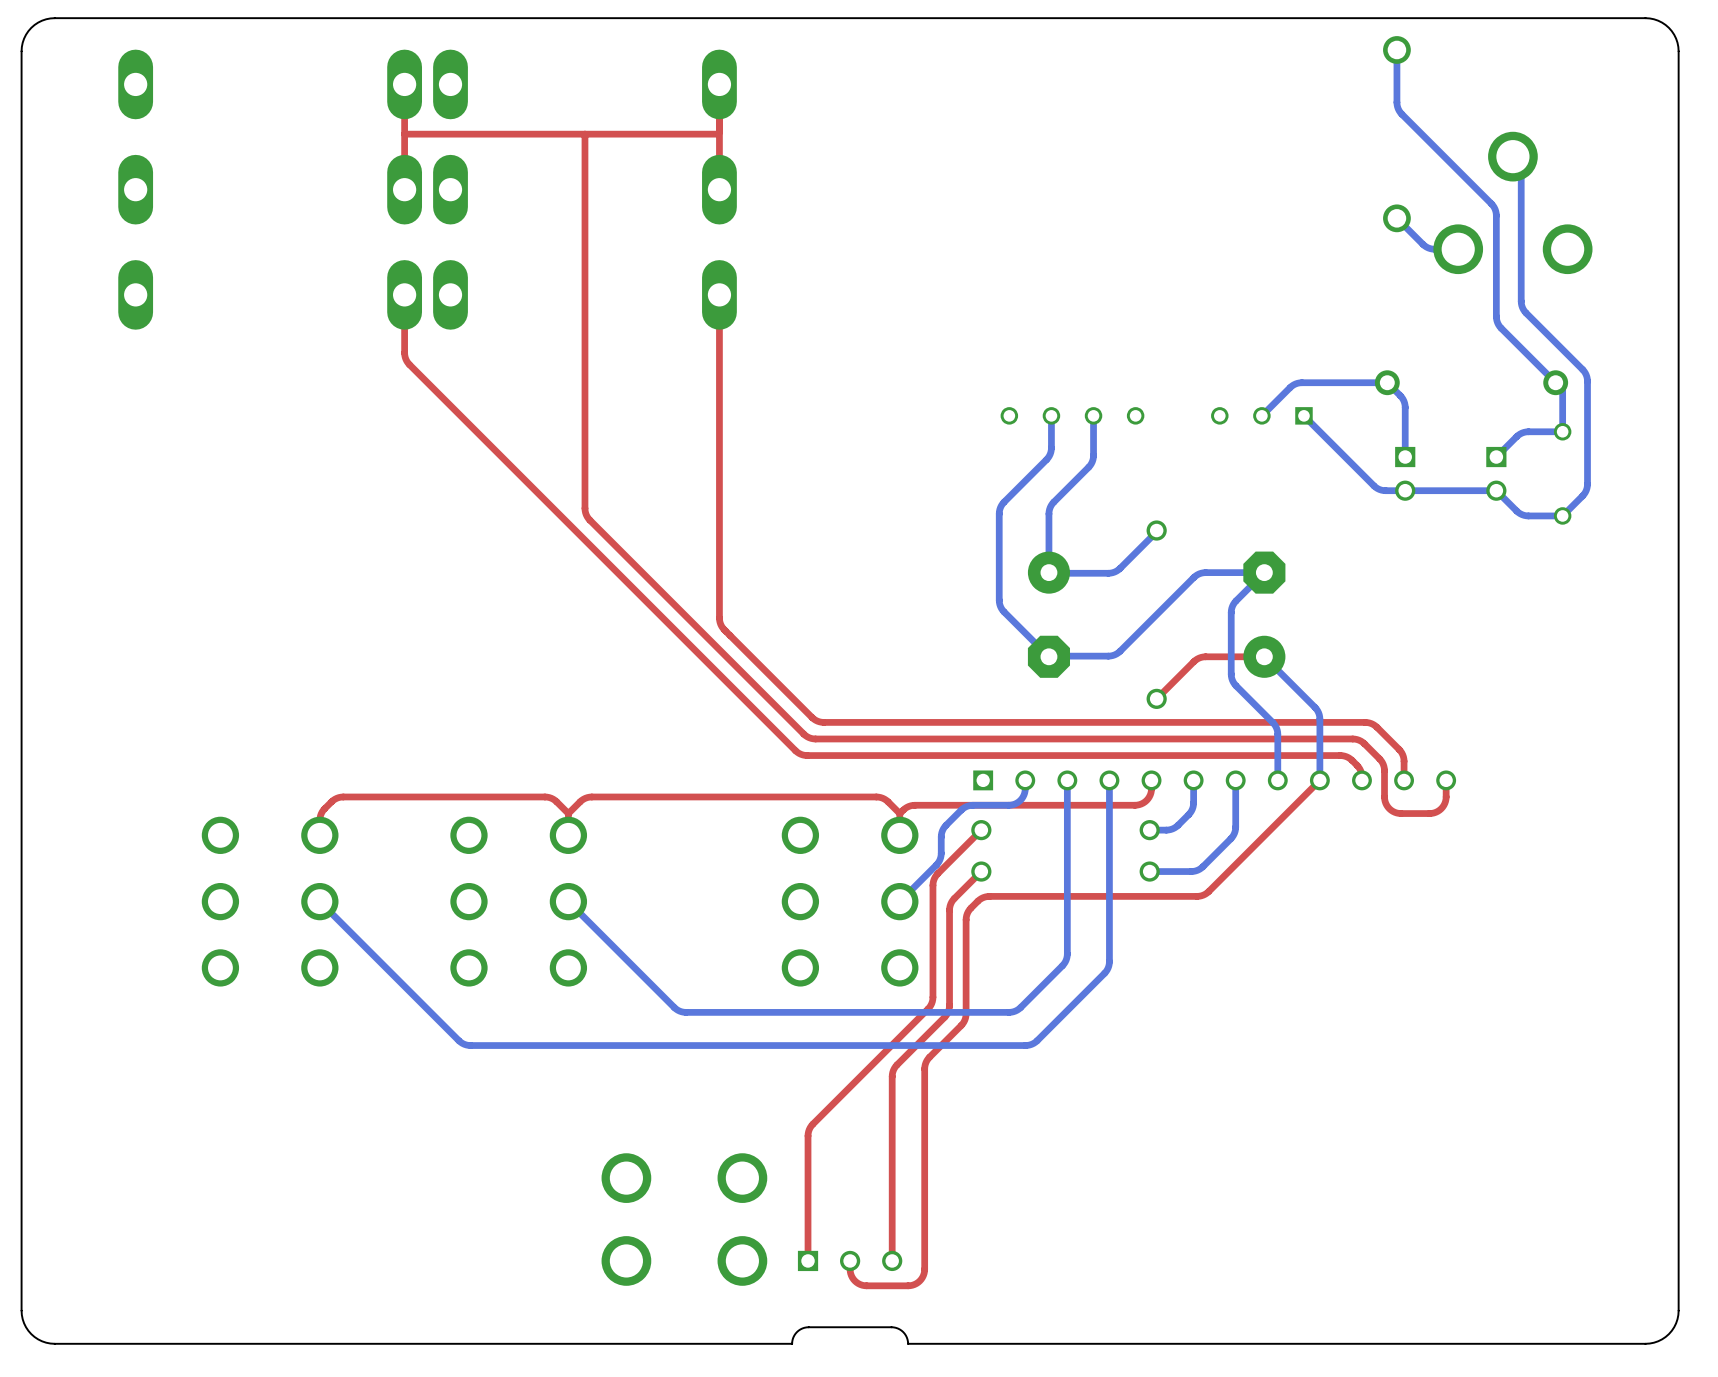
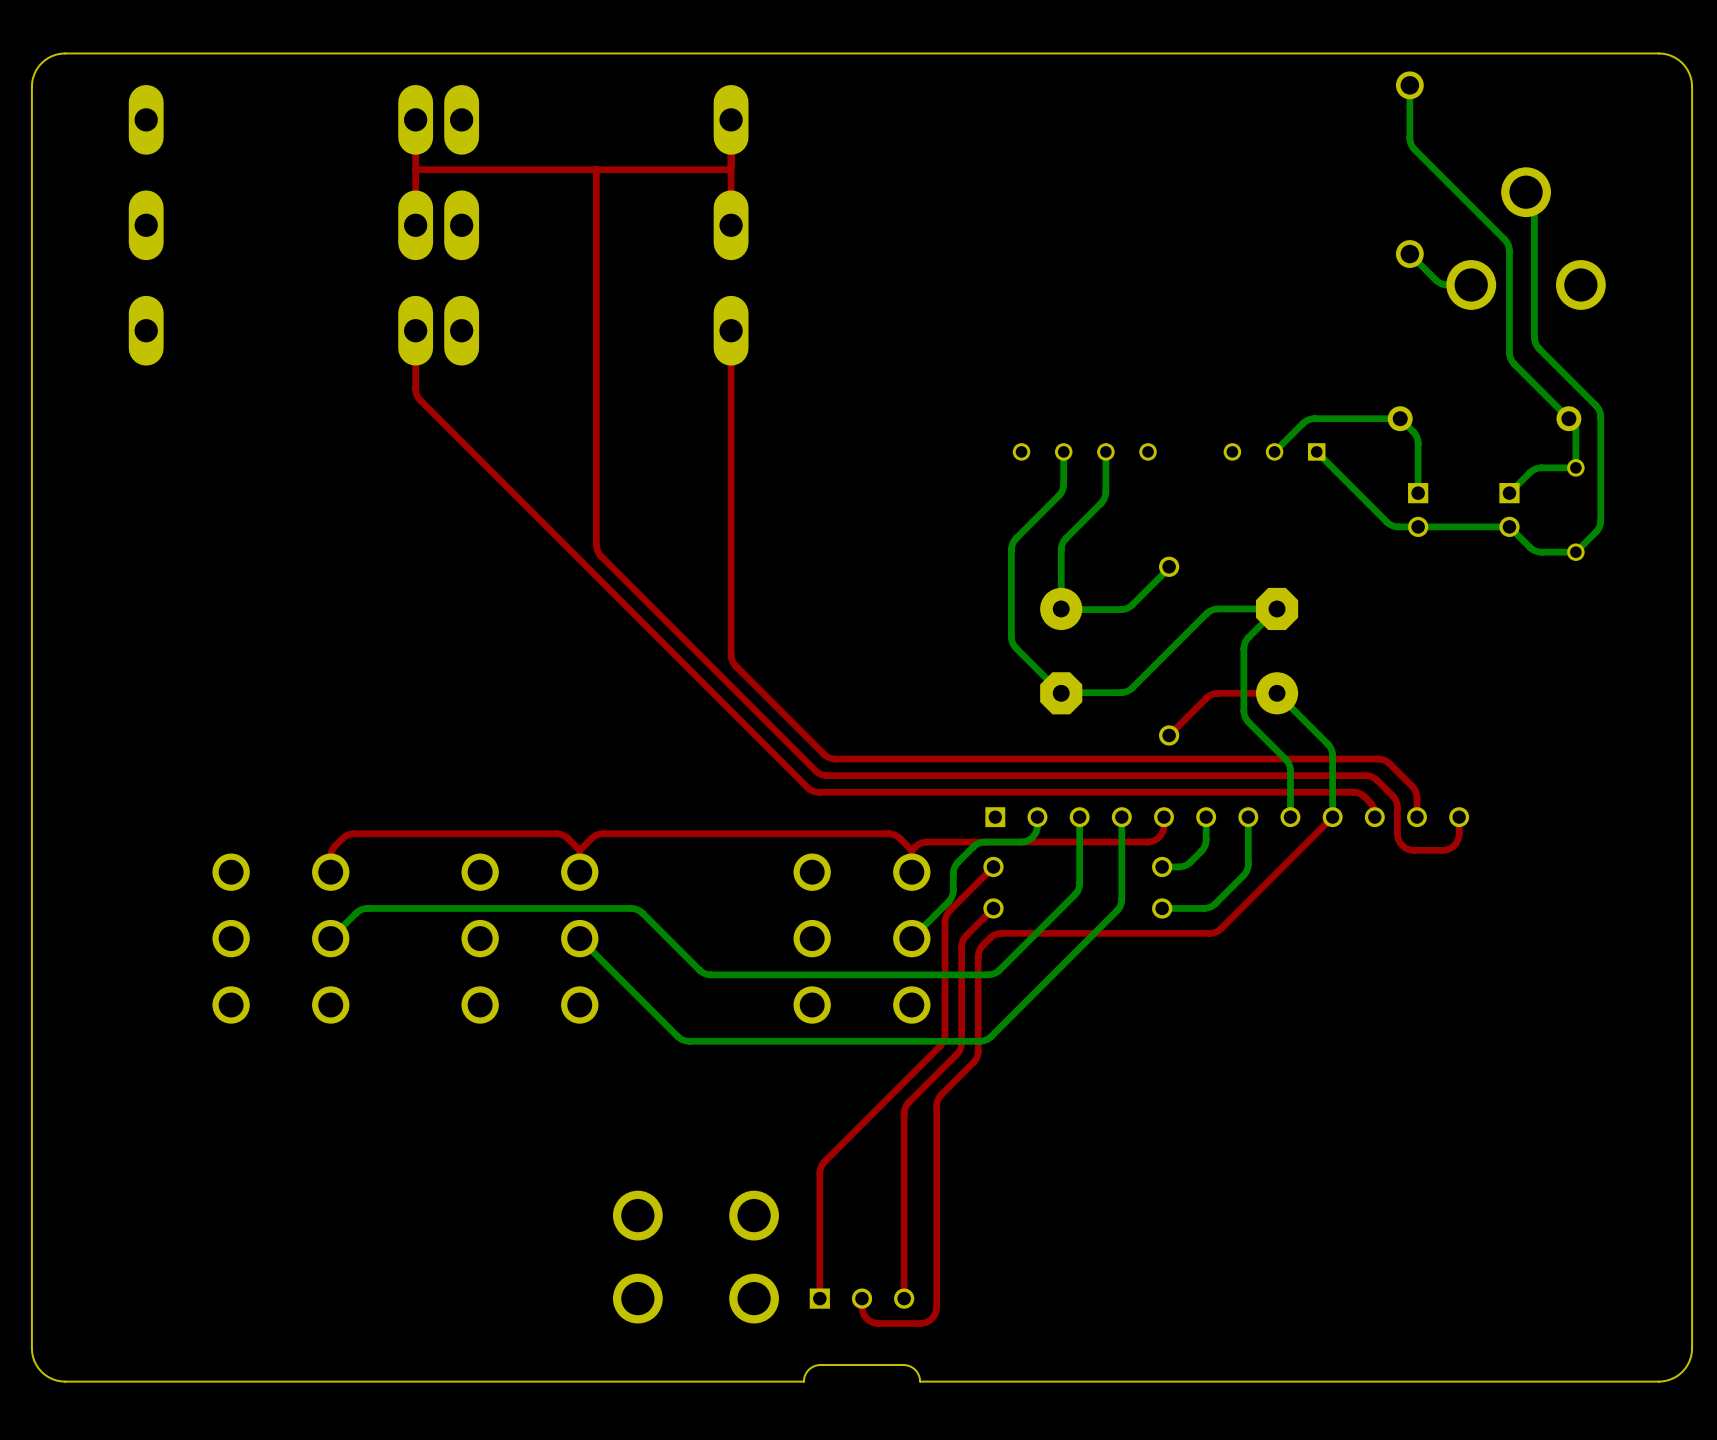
bottom track: (1067, 846) (1066, 958) (1062, 965) (1015, 1011) (686, 1012) (677, 1010) (666, 999) -> (1121, 899) (1116, 910) (991, 1036) (983, 1040) (689, 1041) (677, 1036)
bottom track: (1109, 862) (1108, 967) (1037, 1040) (1025, 1045) (466, 1044) (458, 1040) (319, 901) -> (1079, 883) (1074, 894) (999, 970) (990, 974) (708, 974) (699, 970) (641, 911) (631, 908) (365, 908) (357, 911) (330, 938)

